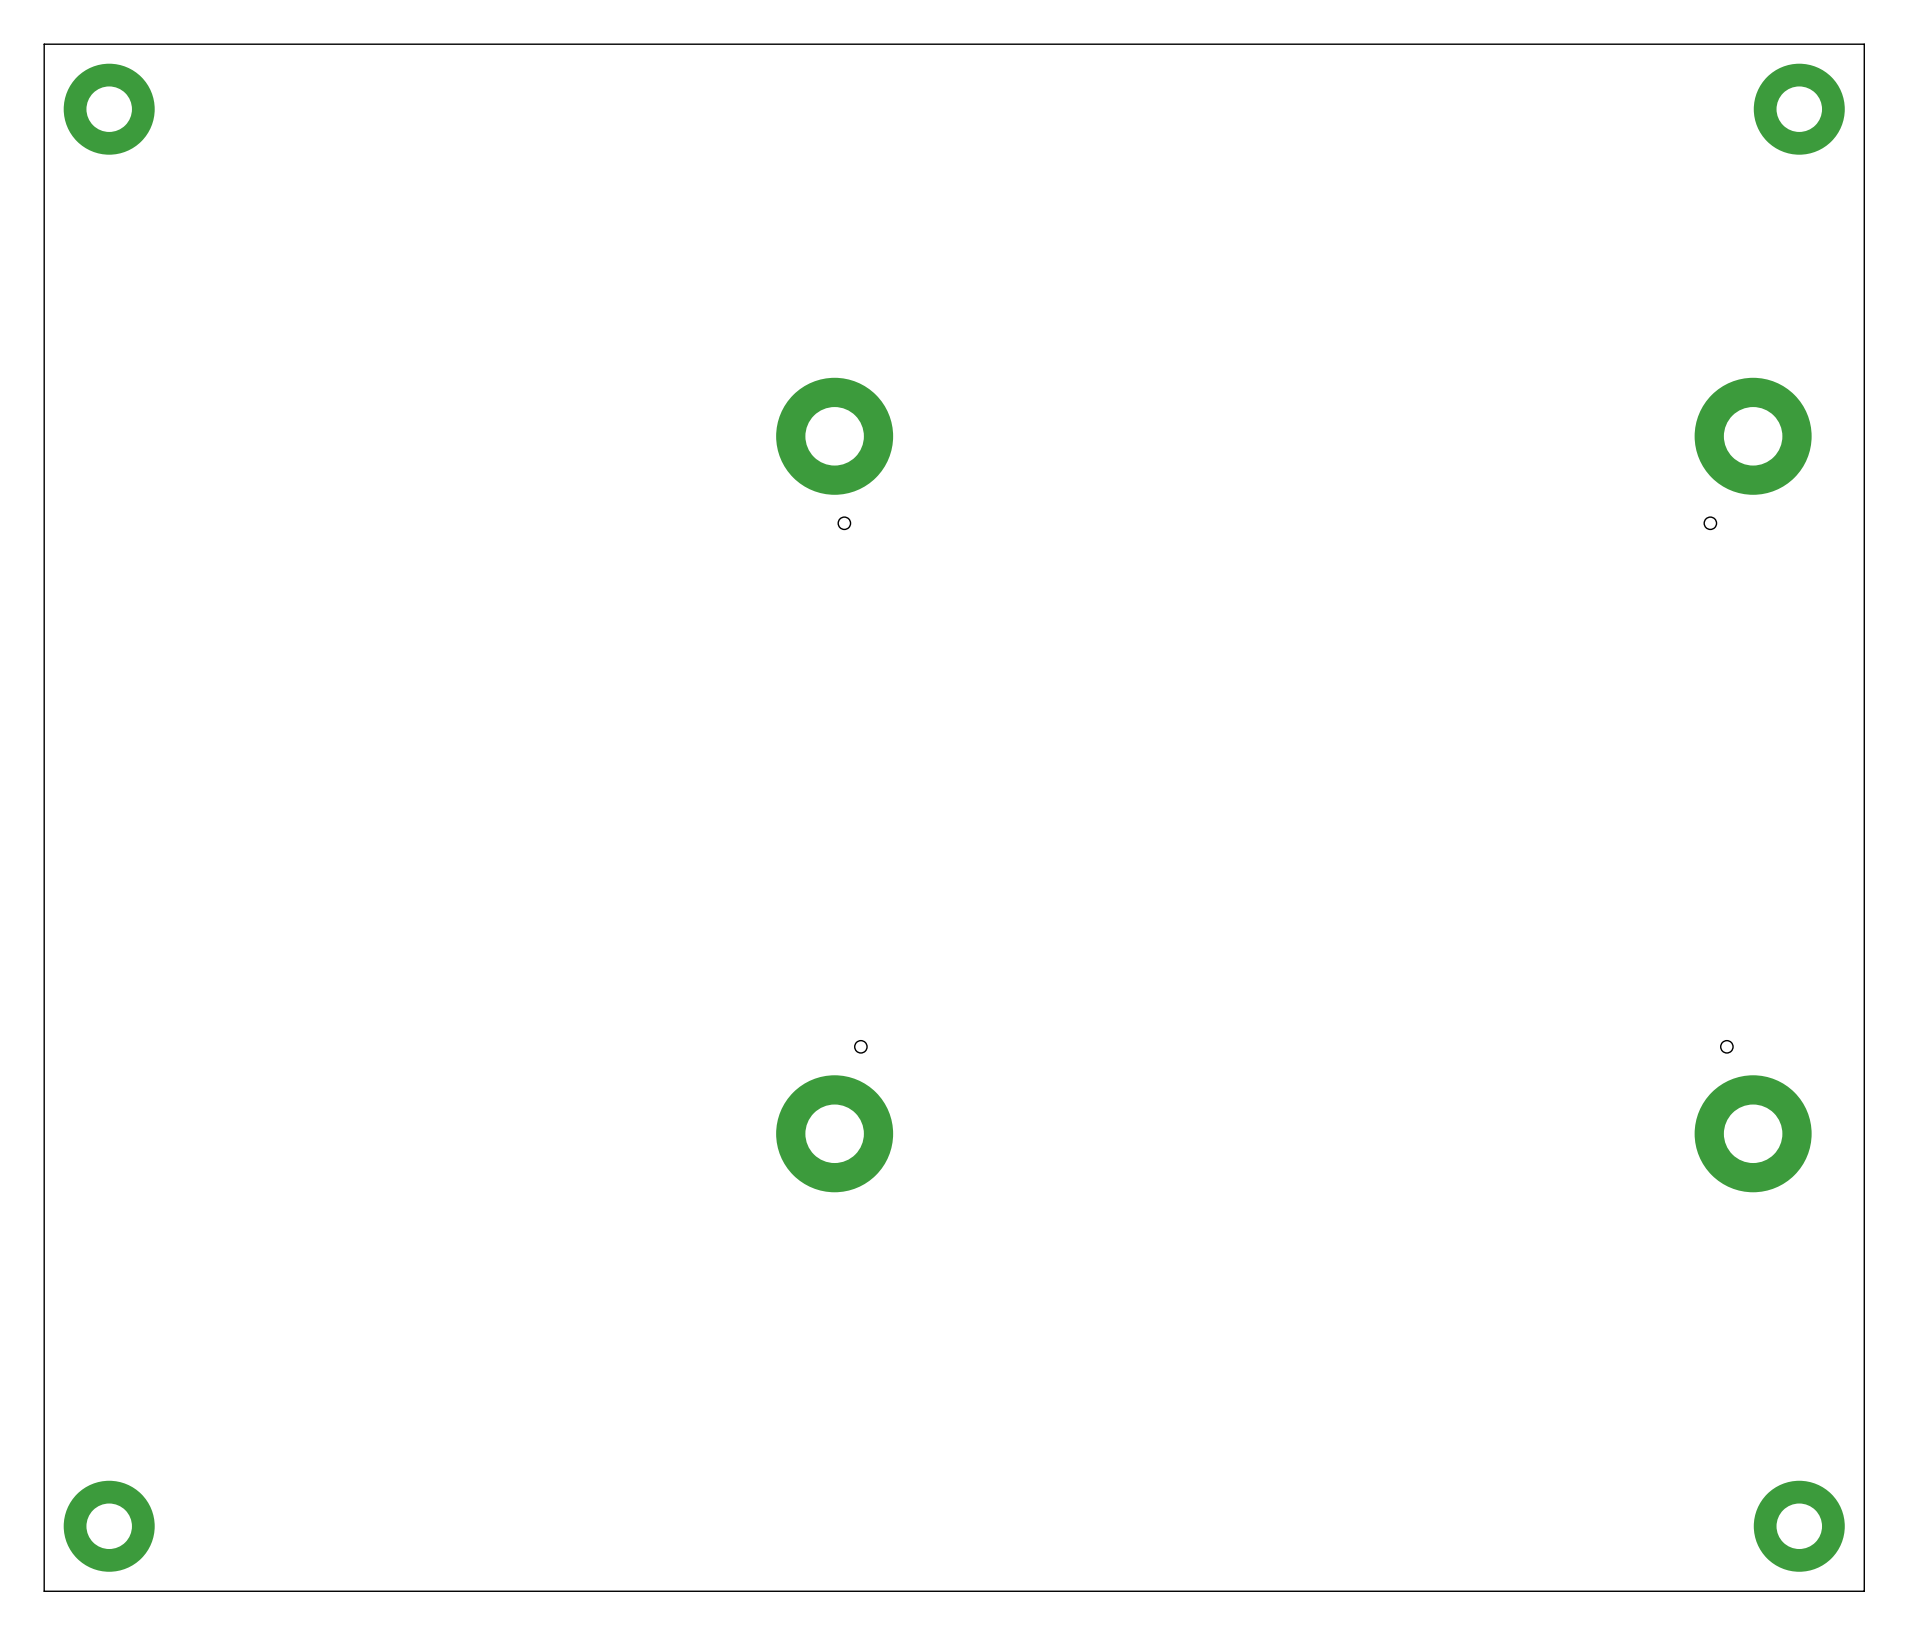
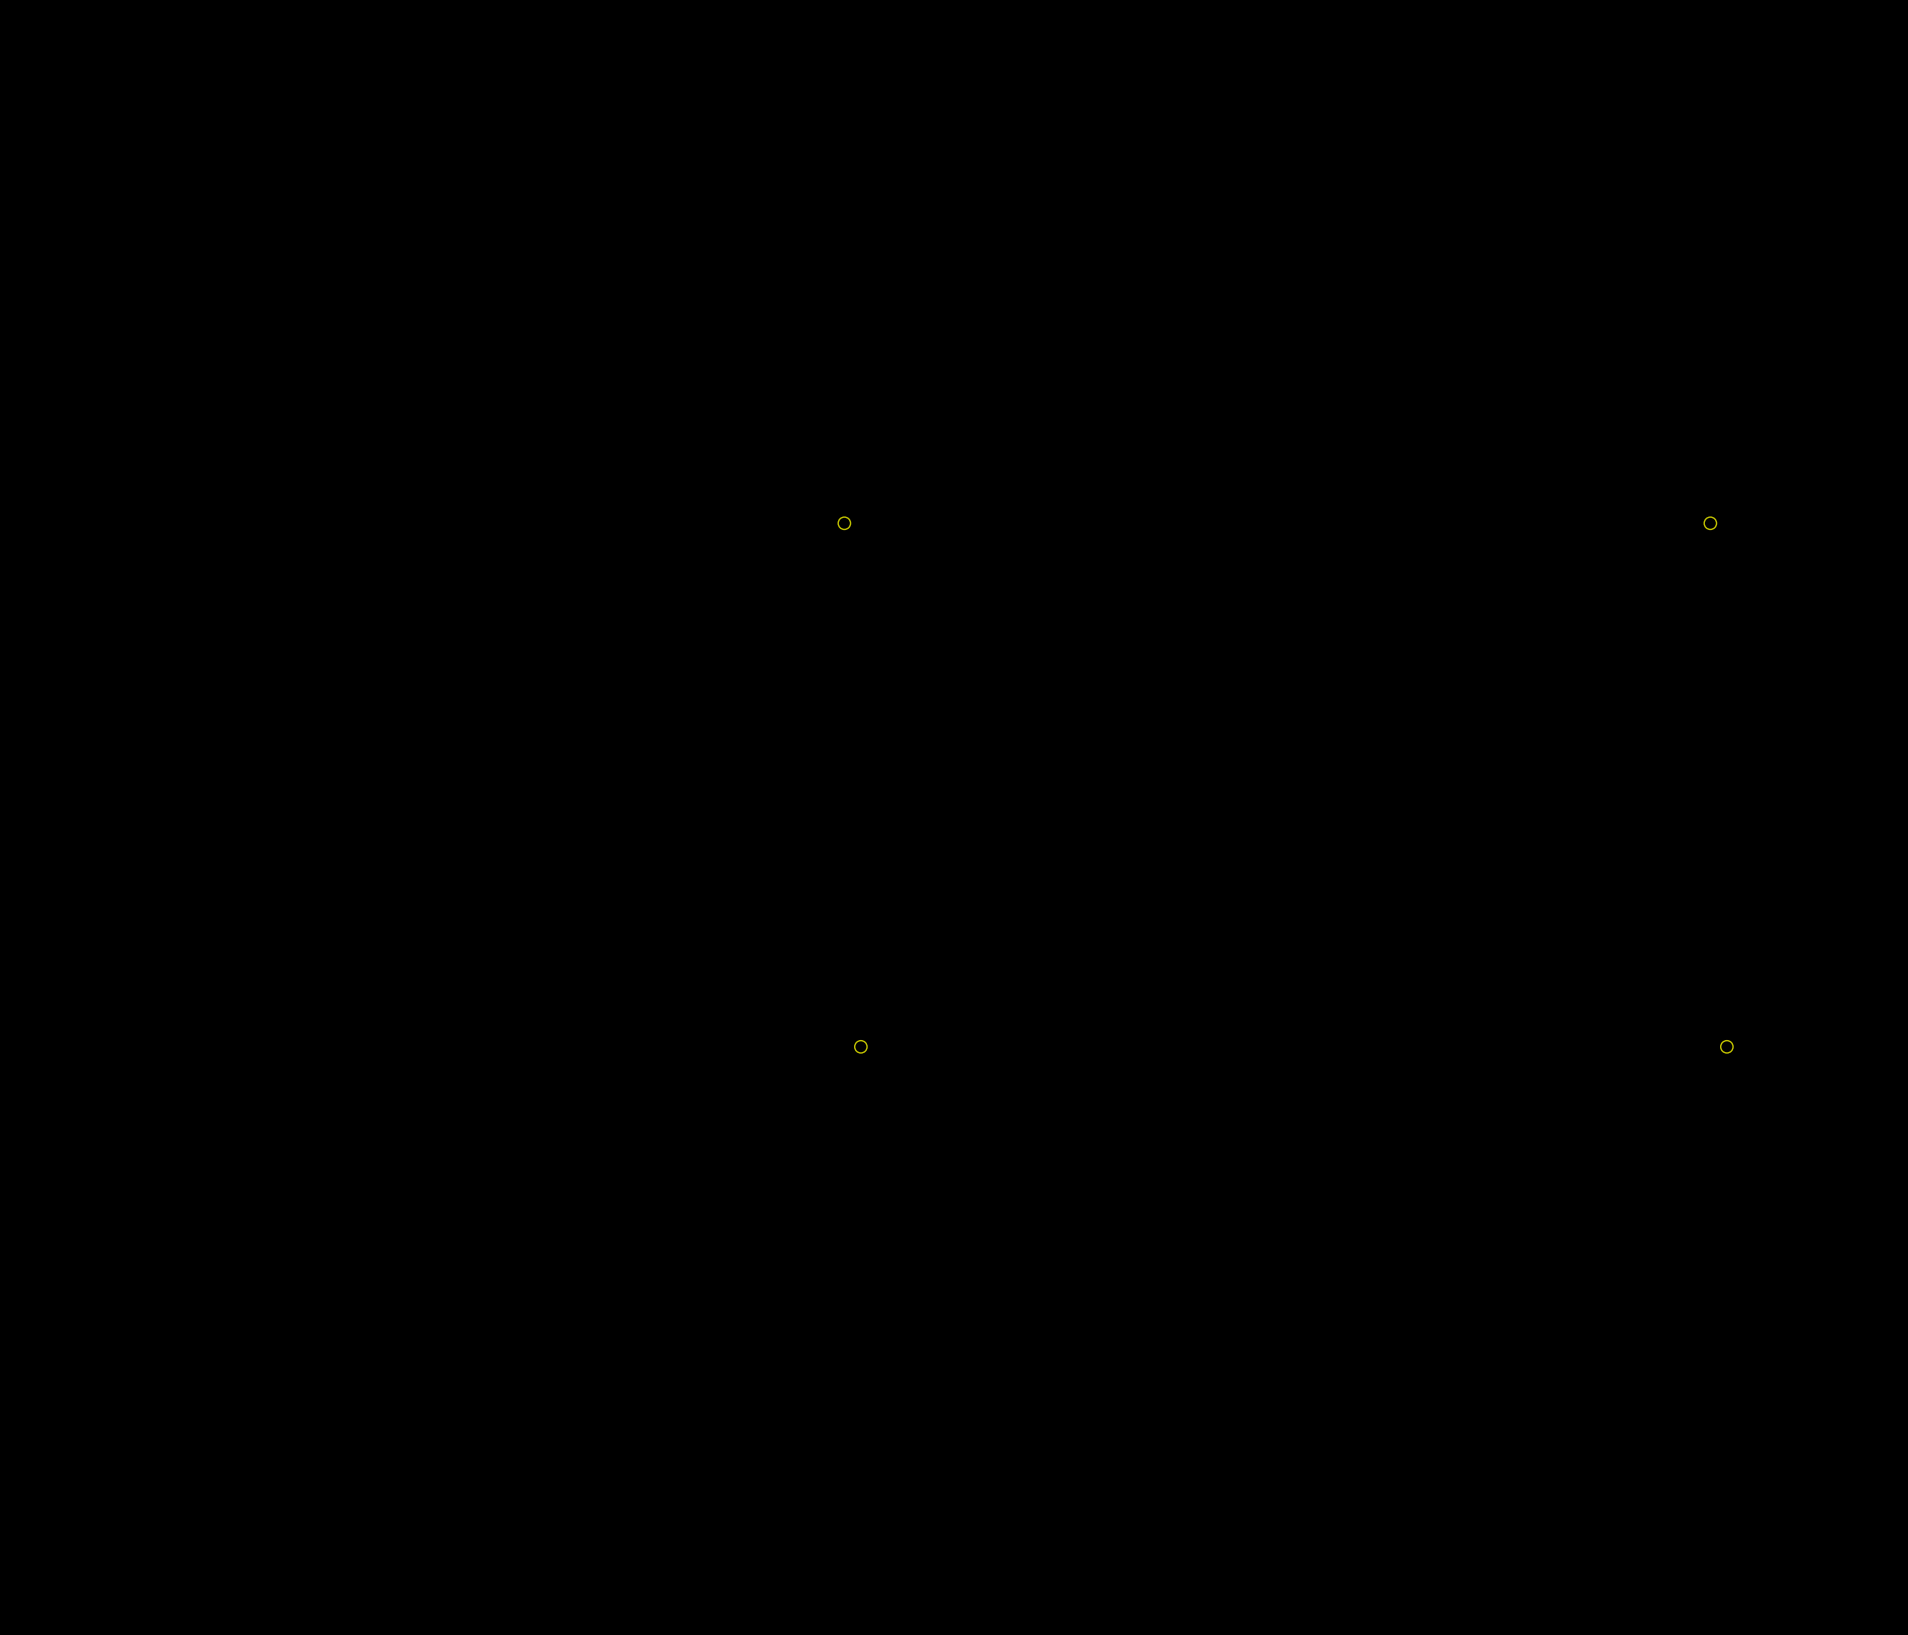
board edge: (1864, 44) (44, 44) (44, 1591) (1864, 1591) (1864, 44) -> none
part: (109, 109) -> none
part: (1799, 109) -> none
part: (834, 436) -> none
part: (1753, 436) -> none
part: (834, 1133) -> none
part: (1753, 1133) -> none
part: (109, 1526) -> none
part: (1799, 1526) -> none

